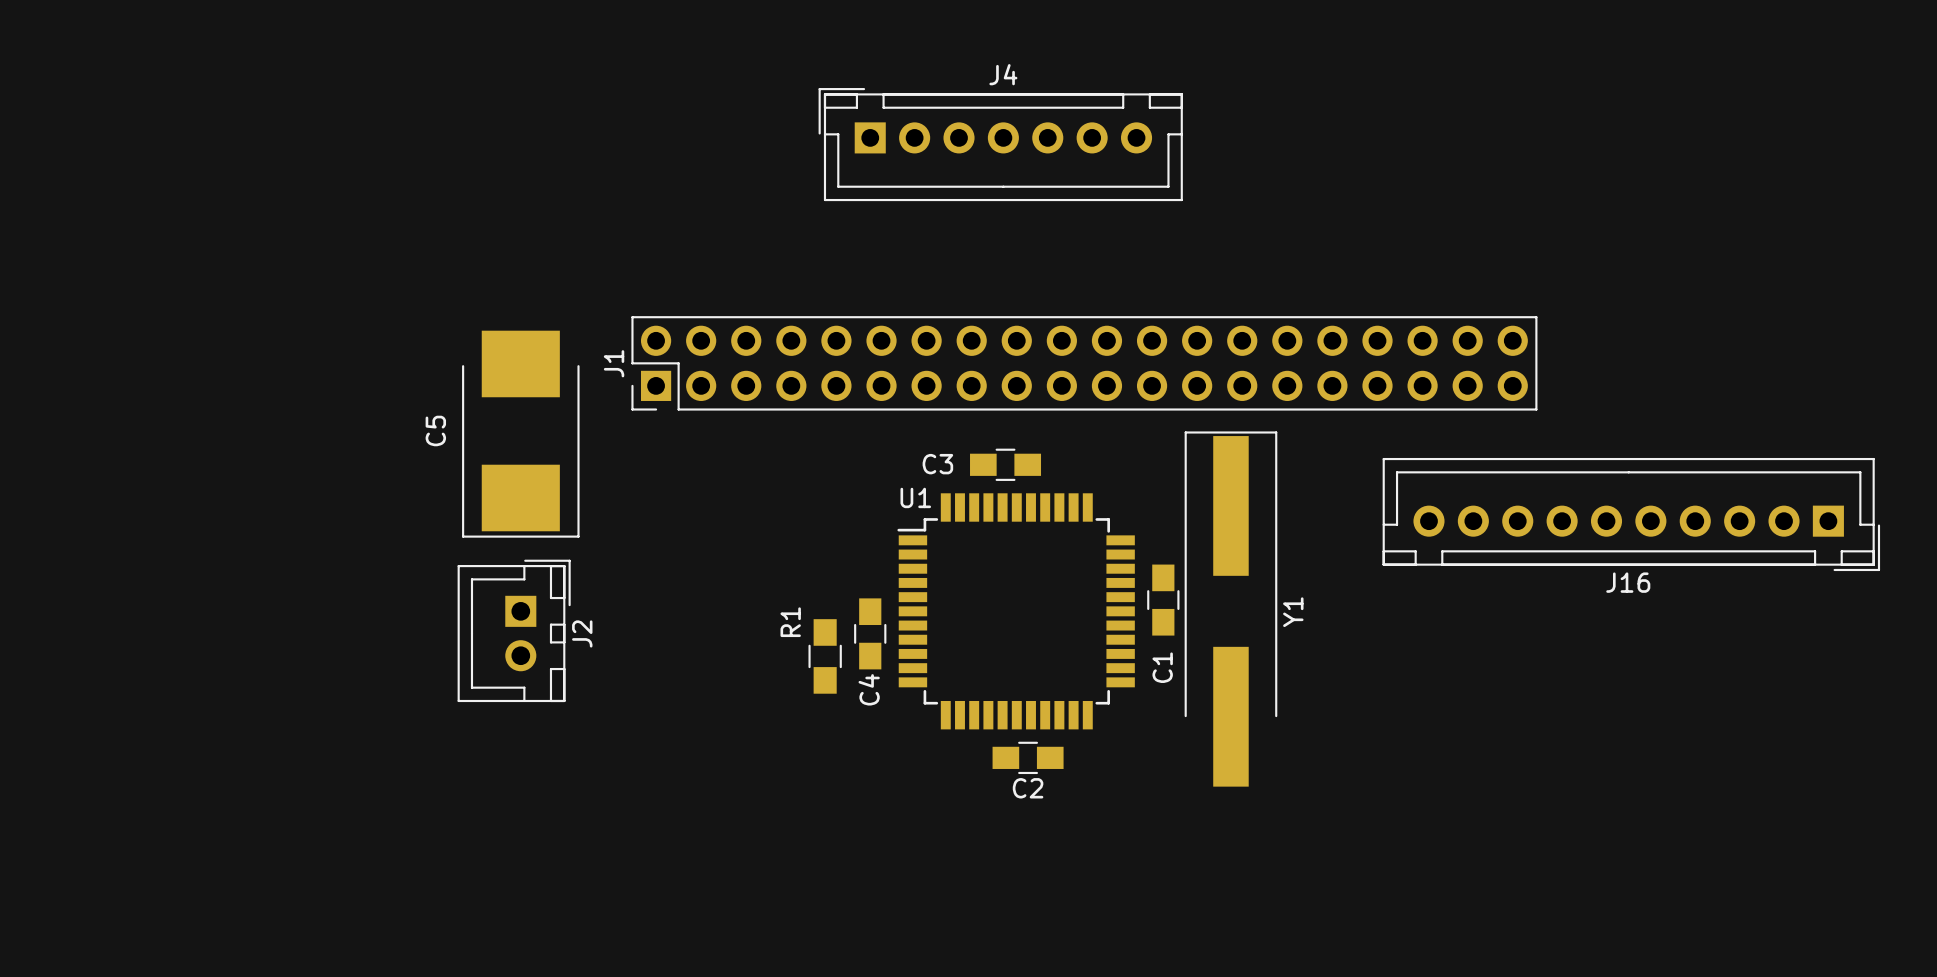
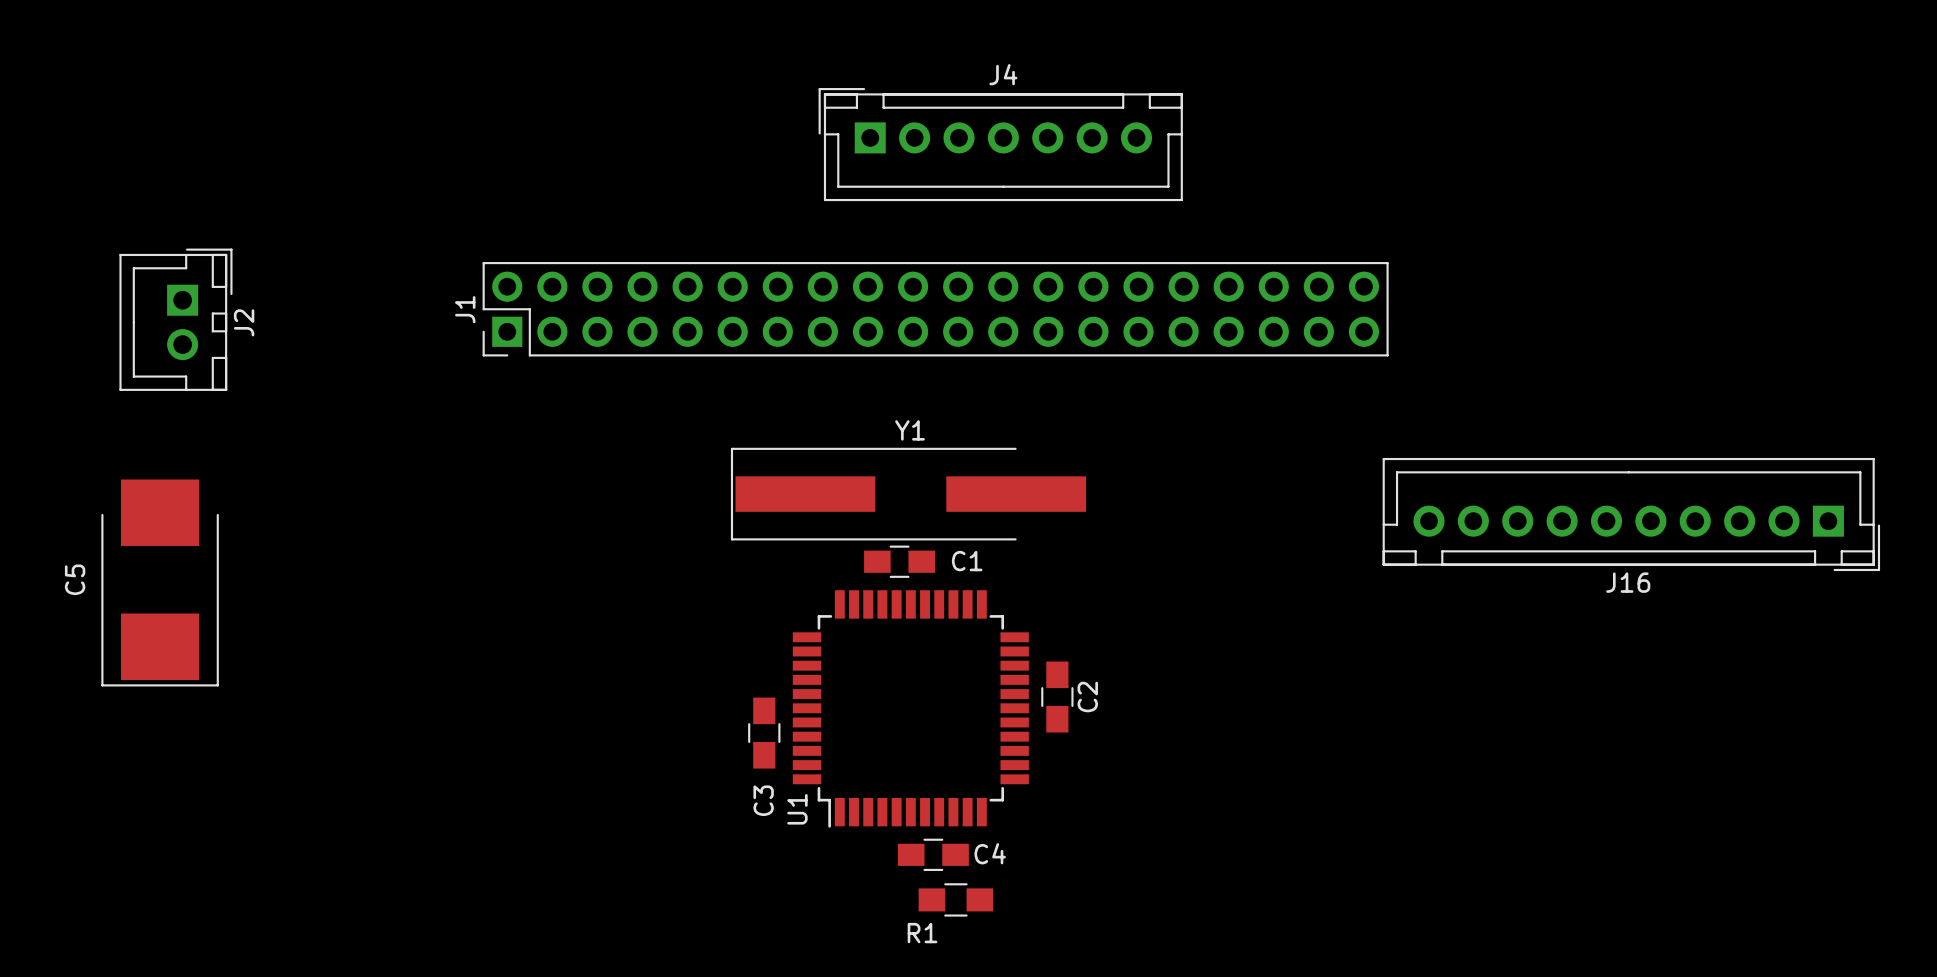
J1 position: (1084, 363) -> (935, 309)
C5 position: (520, 434) -> (160, 582)
C3 name position: C3 (937, 464) -> C3 (763, 800)
C3 rotation: 0° (1005, 464) -> 90° clockwise (764, 733)
C3 position: (1005, 464) -> (764, 733)
C1 rotation: 0° (1163, 600) -> 90° clockwise (899, 561)
C1 position: (1163, 600) -> (899, 561)
Y1 rotation: 0° (1230, 609) -> 90° counterclockwise (908, 494)
Y1 position: (1230, 609) -> (908, 494)
U1 rotation: 0° (1016, 611) -> 90° counterclockwise (910, 708)
U1 position: (1016, 611) -> (910, 708)
R1 name position: R1 (790, 622) -> R1 (922, 933)
J2 position: (514, 630) -> (175, 319)
C4 rotation: 0° (870, 633) -> 90° clockwise (933, 854)
C4 position: (870, 633) -> (933, 854)
R1 rotation: 0° (825, 656) -> 90° clockwise (955, 899)
R1 position: (825, 656) -> (955, 899)
C1 name position: C1 (1162, 667) -> C1 (967, 561)
C4 name position: C4 (869, 689) -> C4 (990, 853)
C2 rotation: 0° (1028, 757) -> 90° clockwise (1057, 697)
C2 position: (1028, 757) -> (1057, 697)
C2 name position: C2 (1028, 788) -> C2 (1087, 697)

